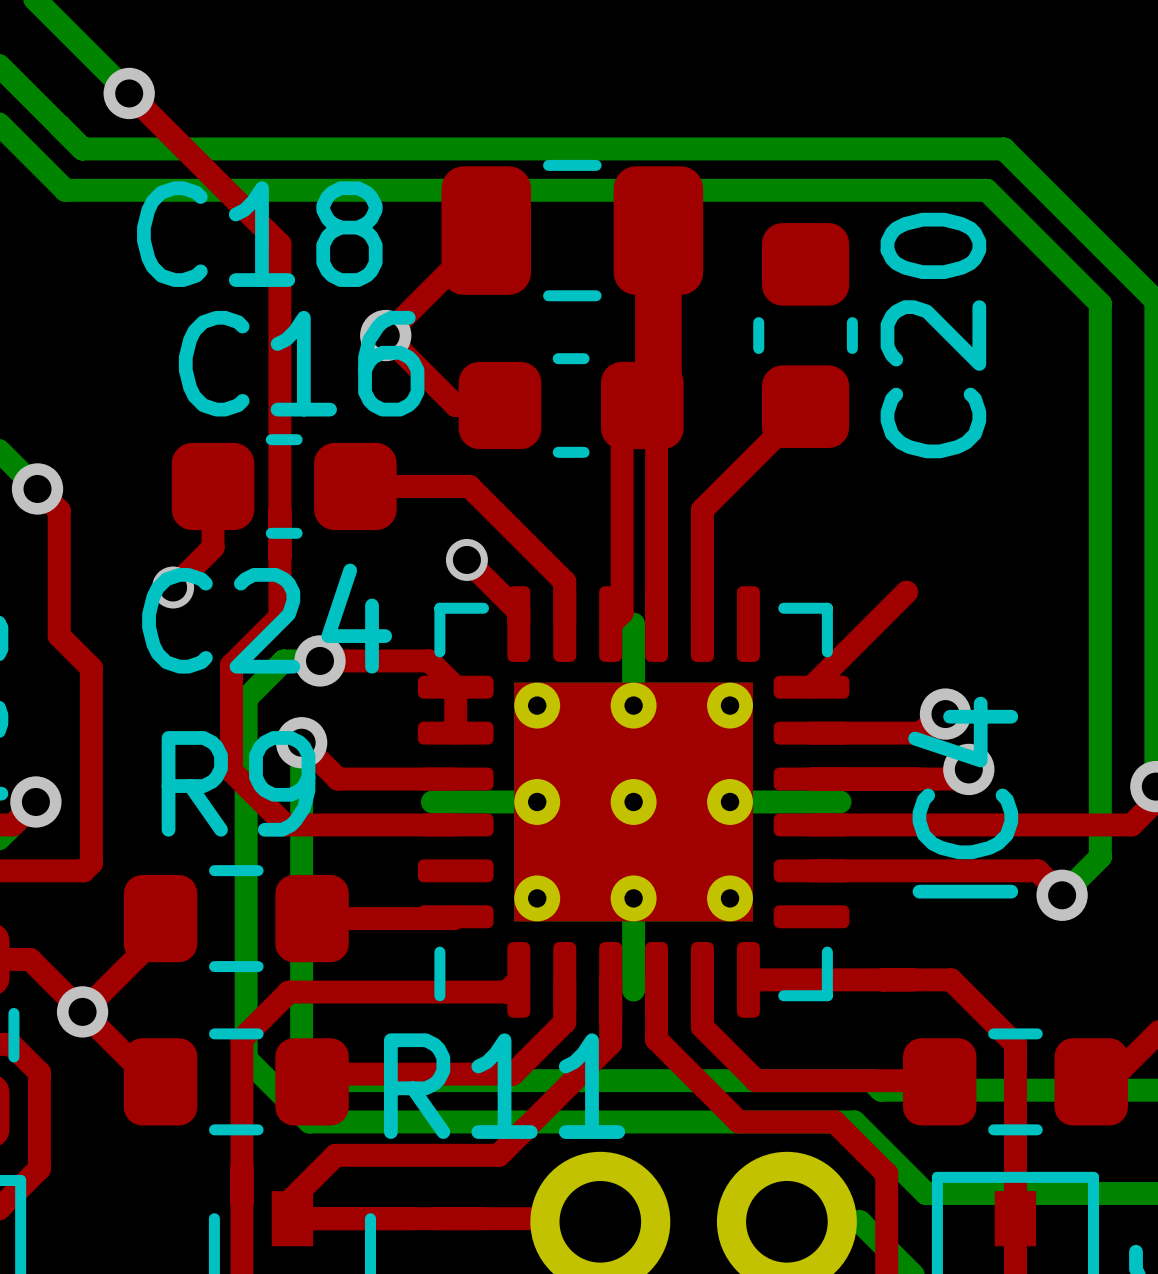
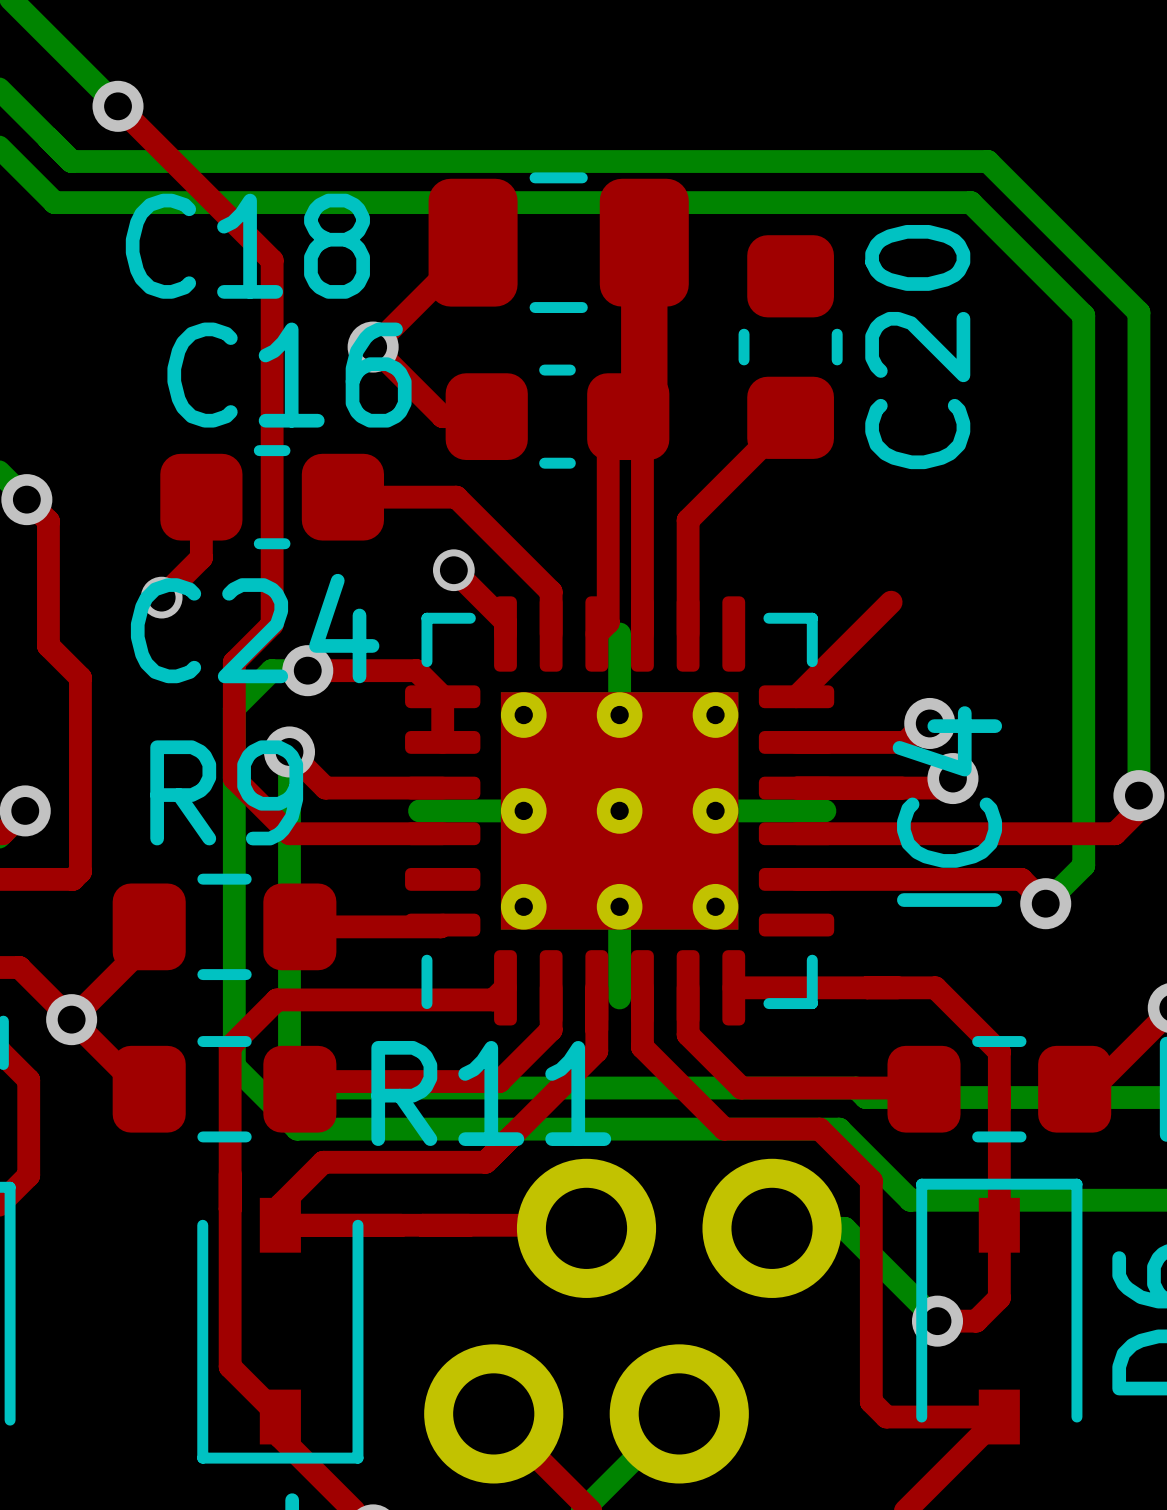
top track: (279, 244) (279, 616) (231, 665) (231, 771) (285, 824) (301, 824) -> (267, 256) (272, 260) (272, 624) (234, 662) (234, 778) (289, 833)

